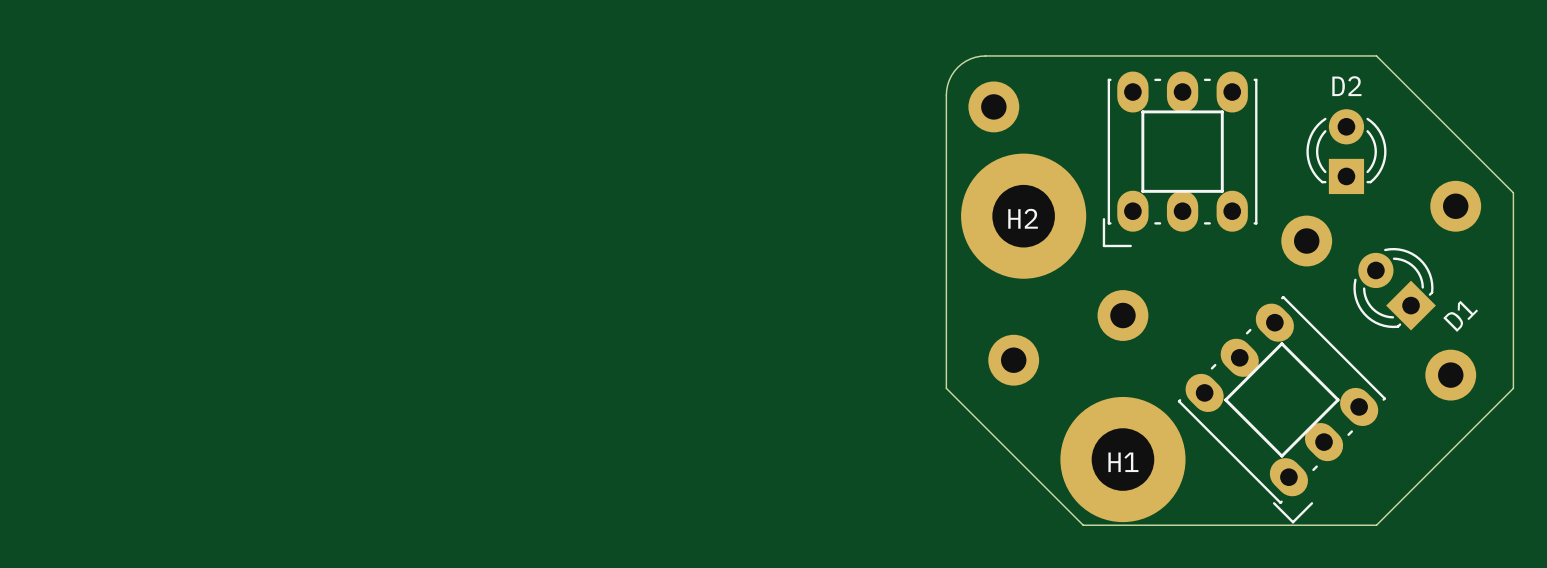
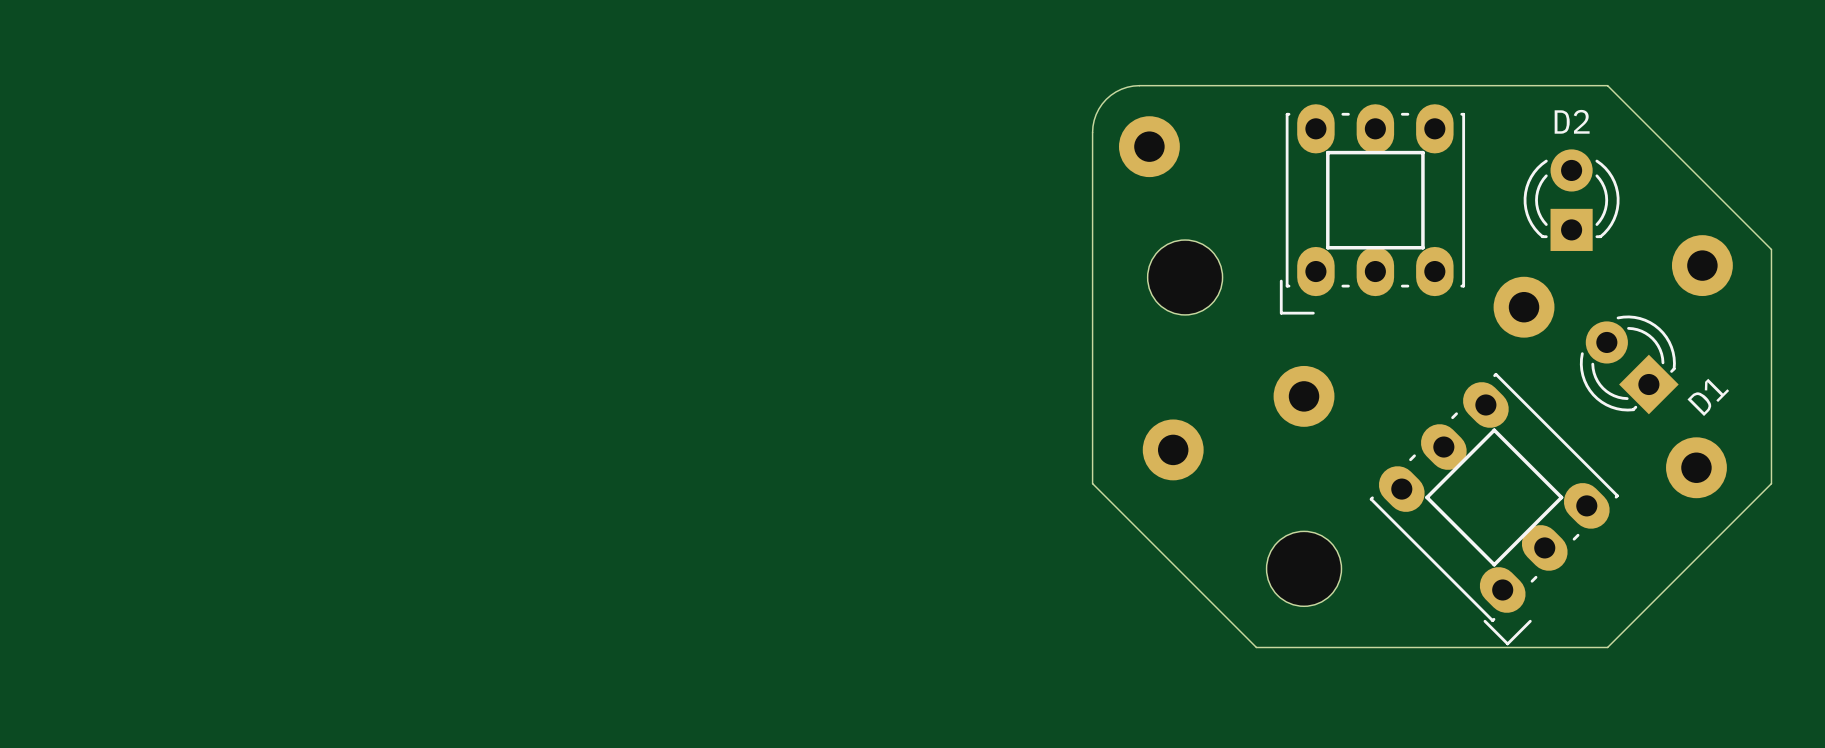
H2: (1023, 216) -> none
part: none -> (1185, 277)
H1: (1122, 459) -> none
part: none -> (1304, 568)

